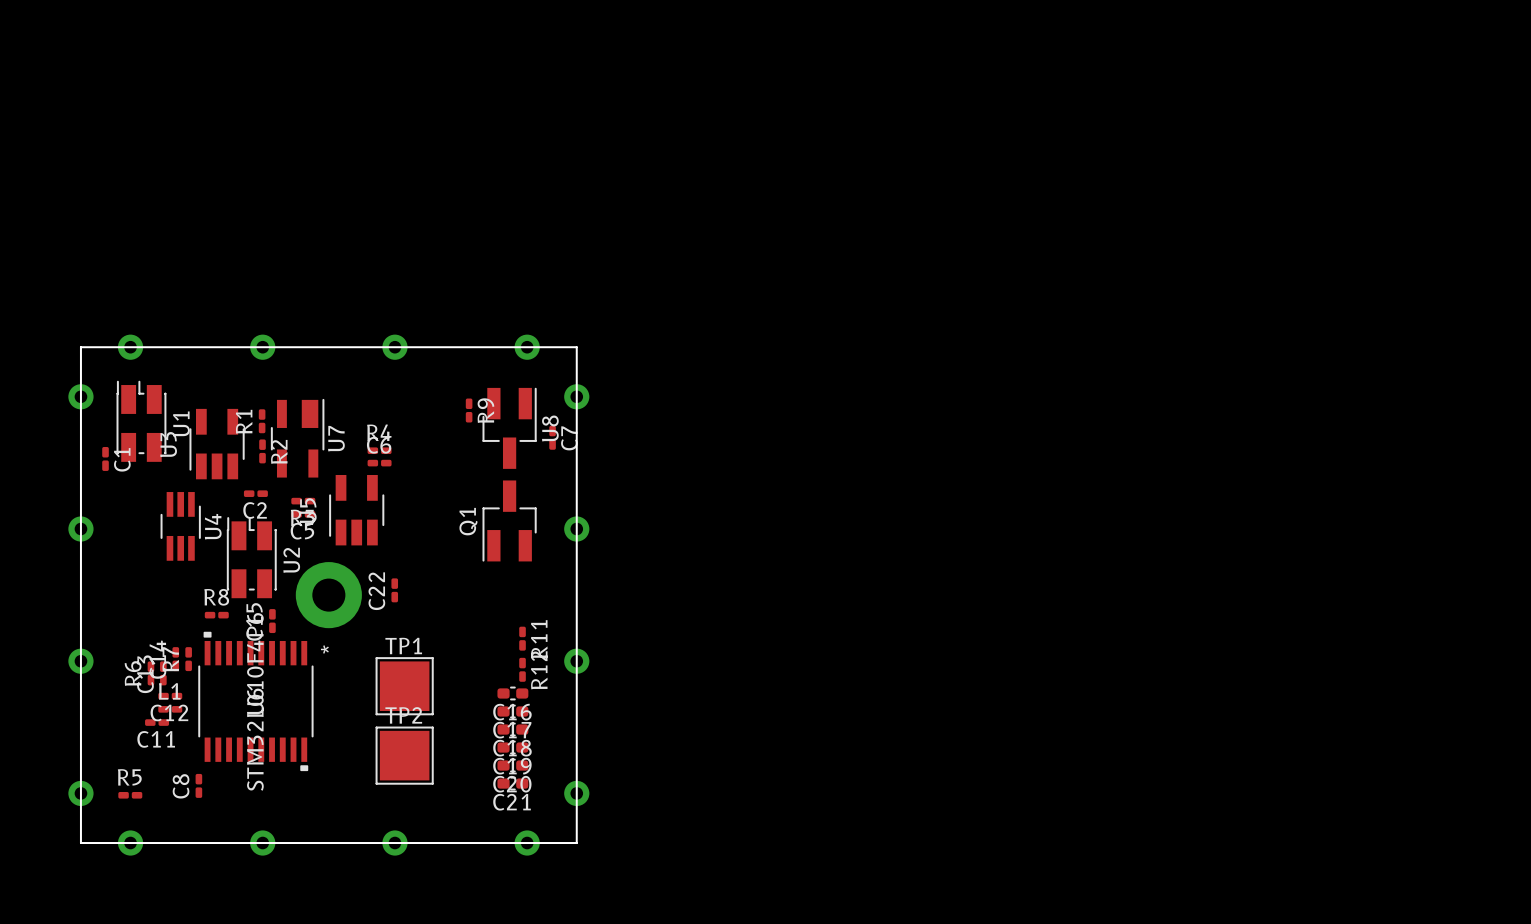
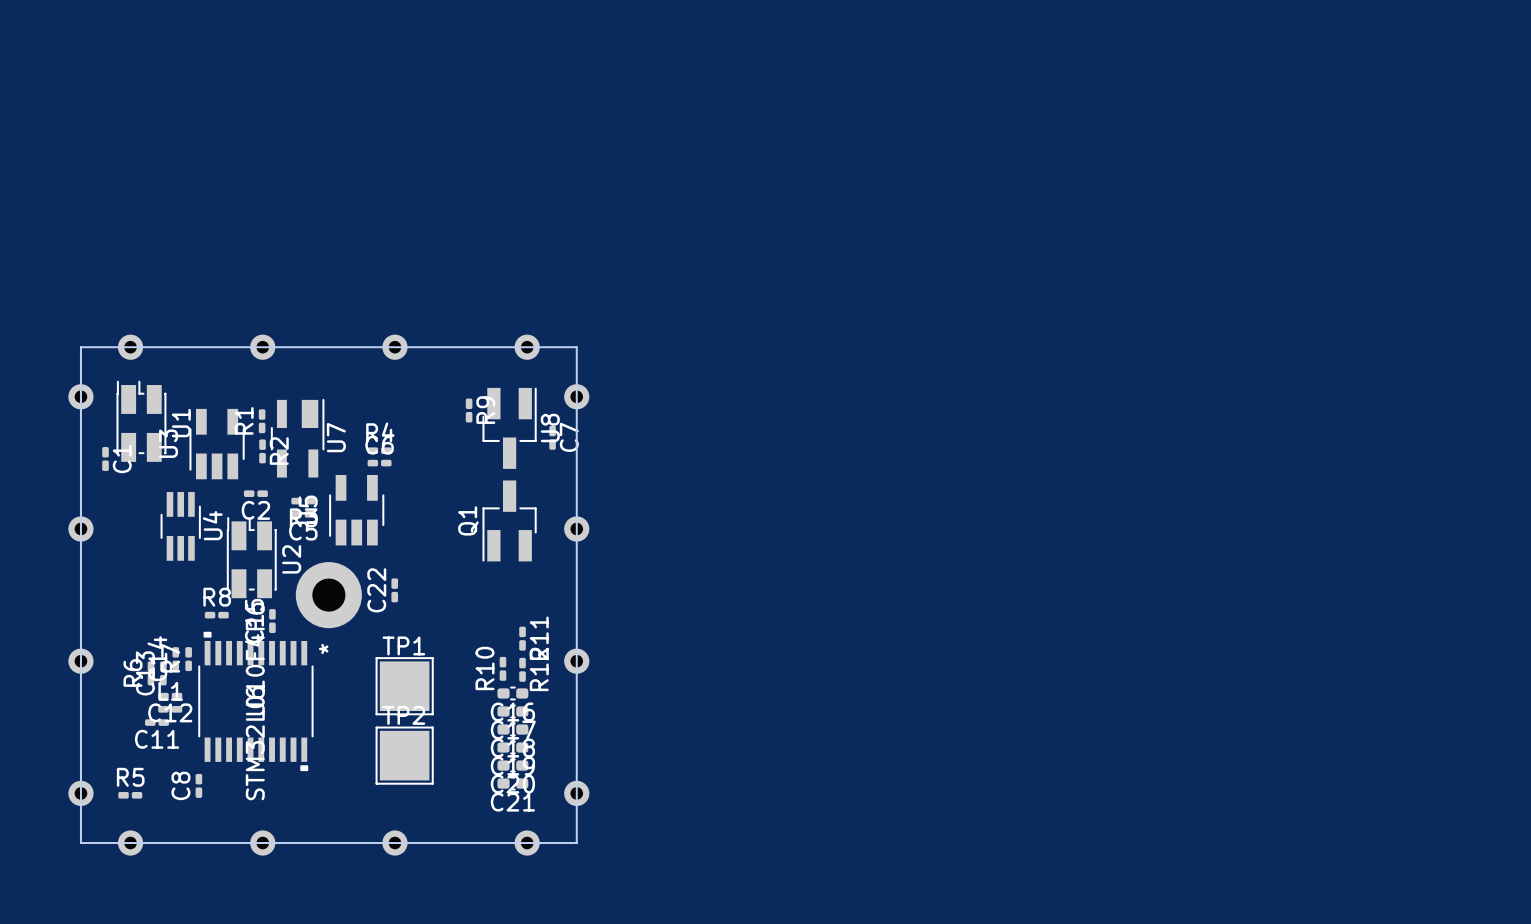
R10: none -> (502, 668)

